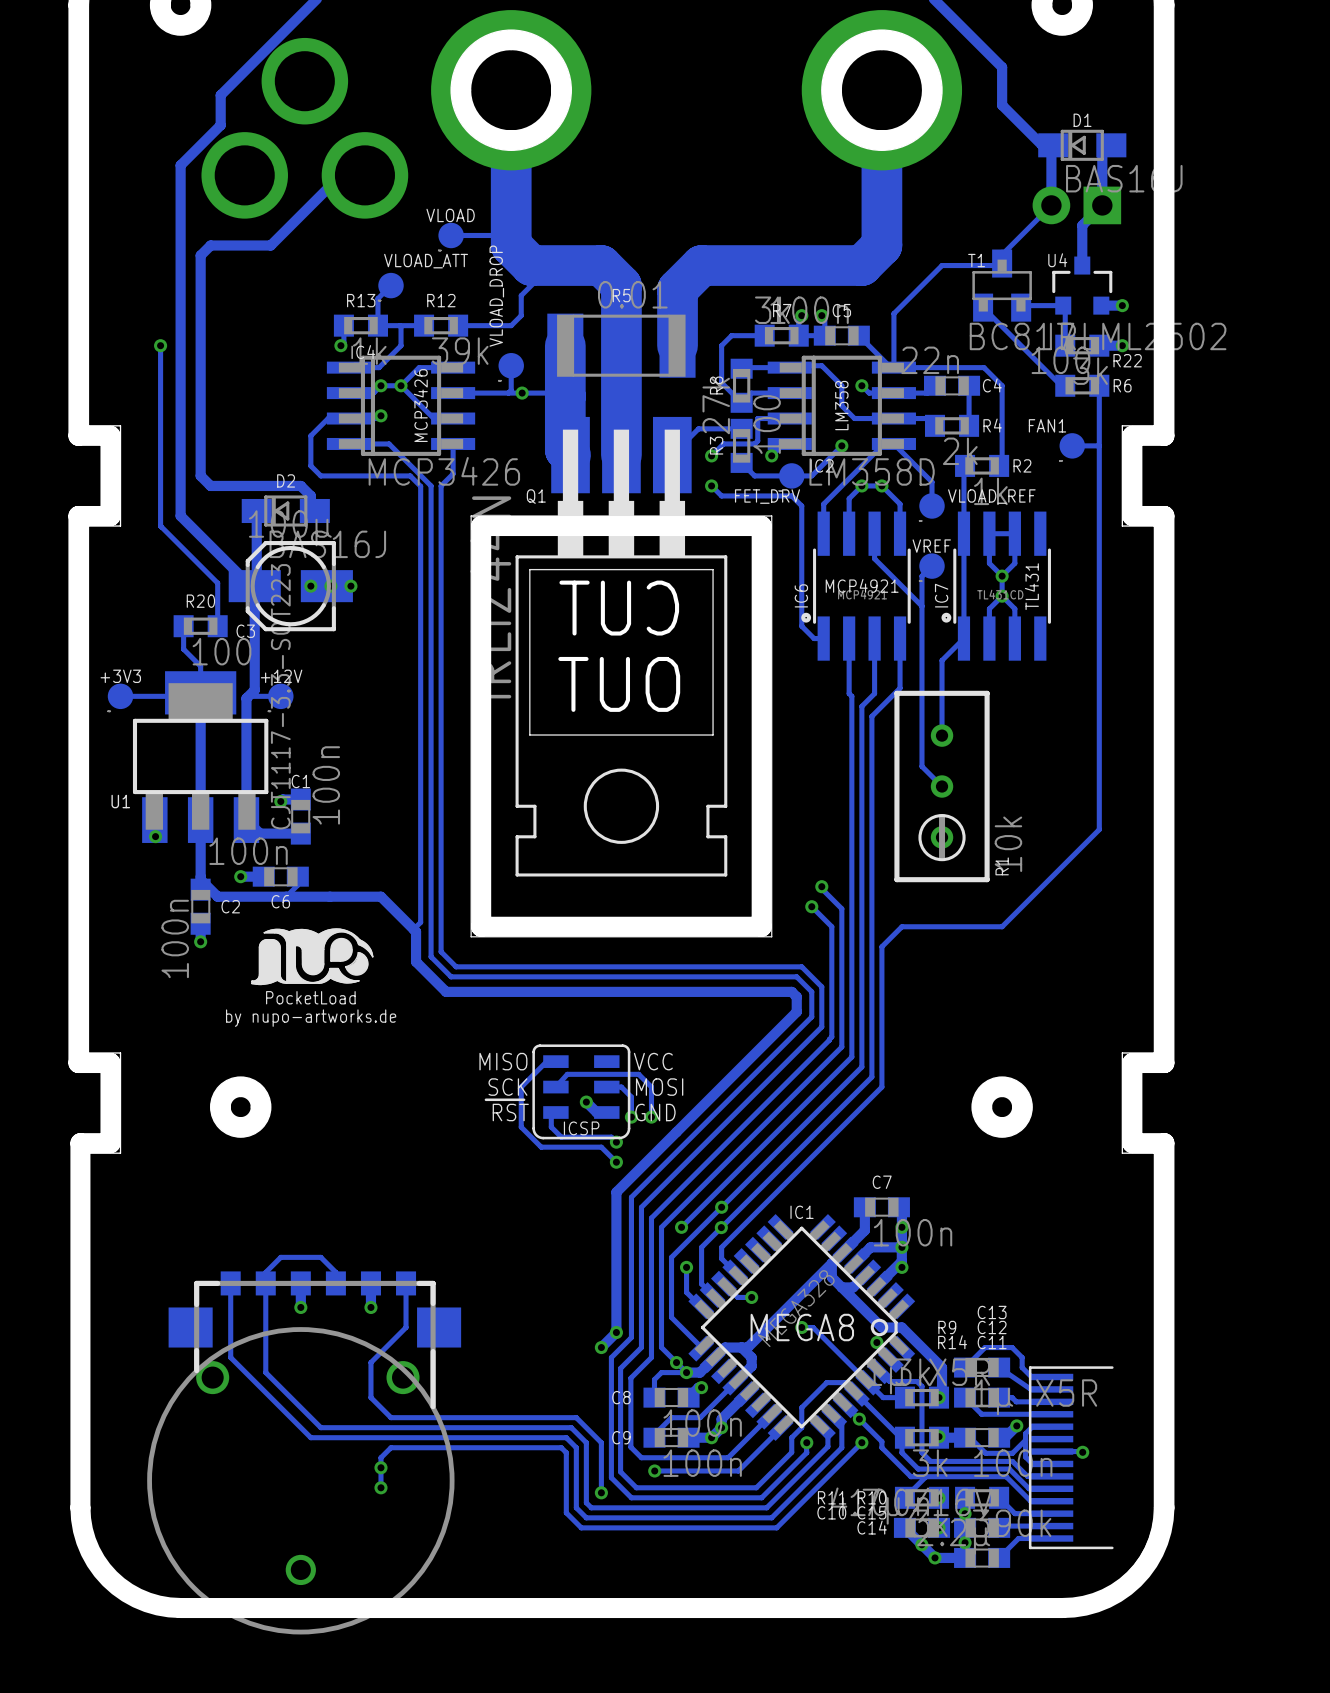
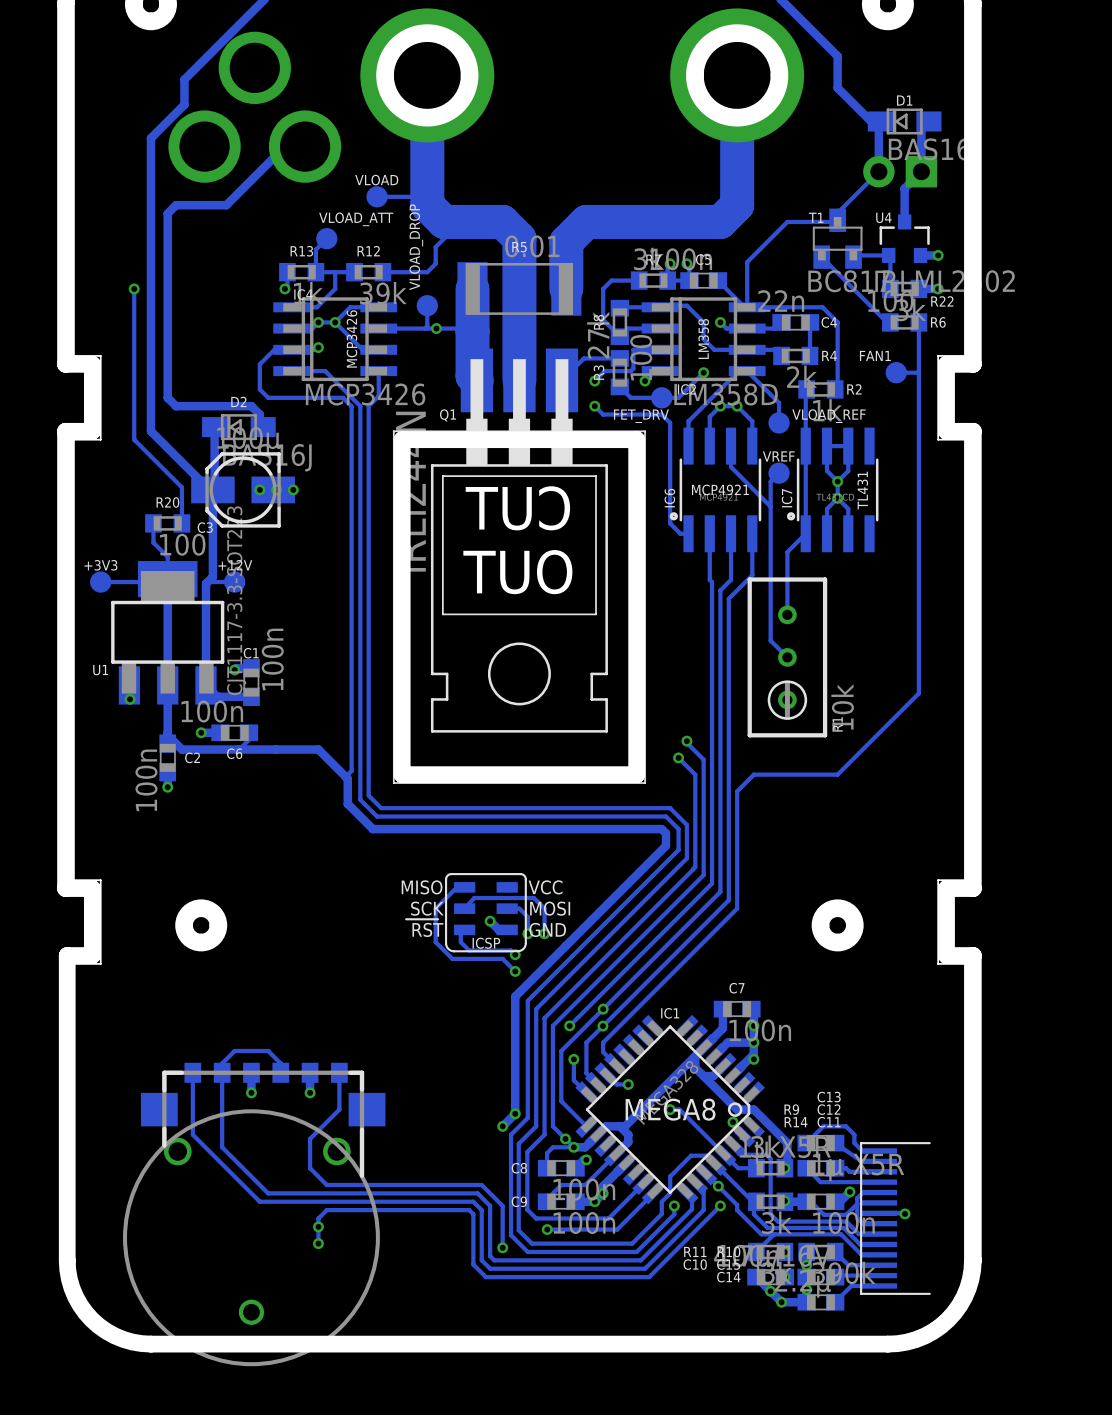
drawing: [251, 928, 374, 986] -> none
text: PocketLoad (310, 997) -> none
text: by nupo-artworks.de (311, 1018) -> none

